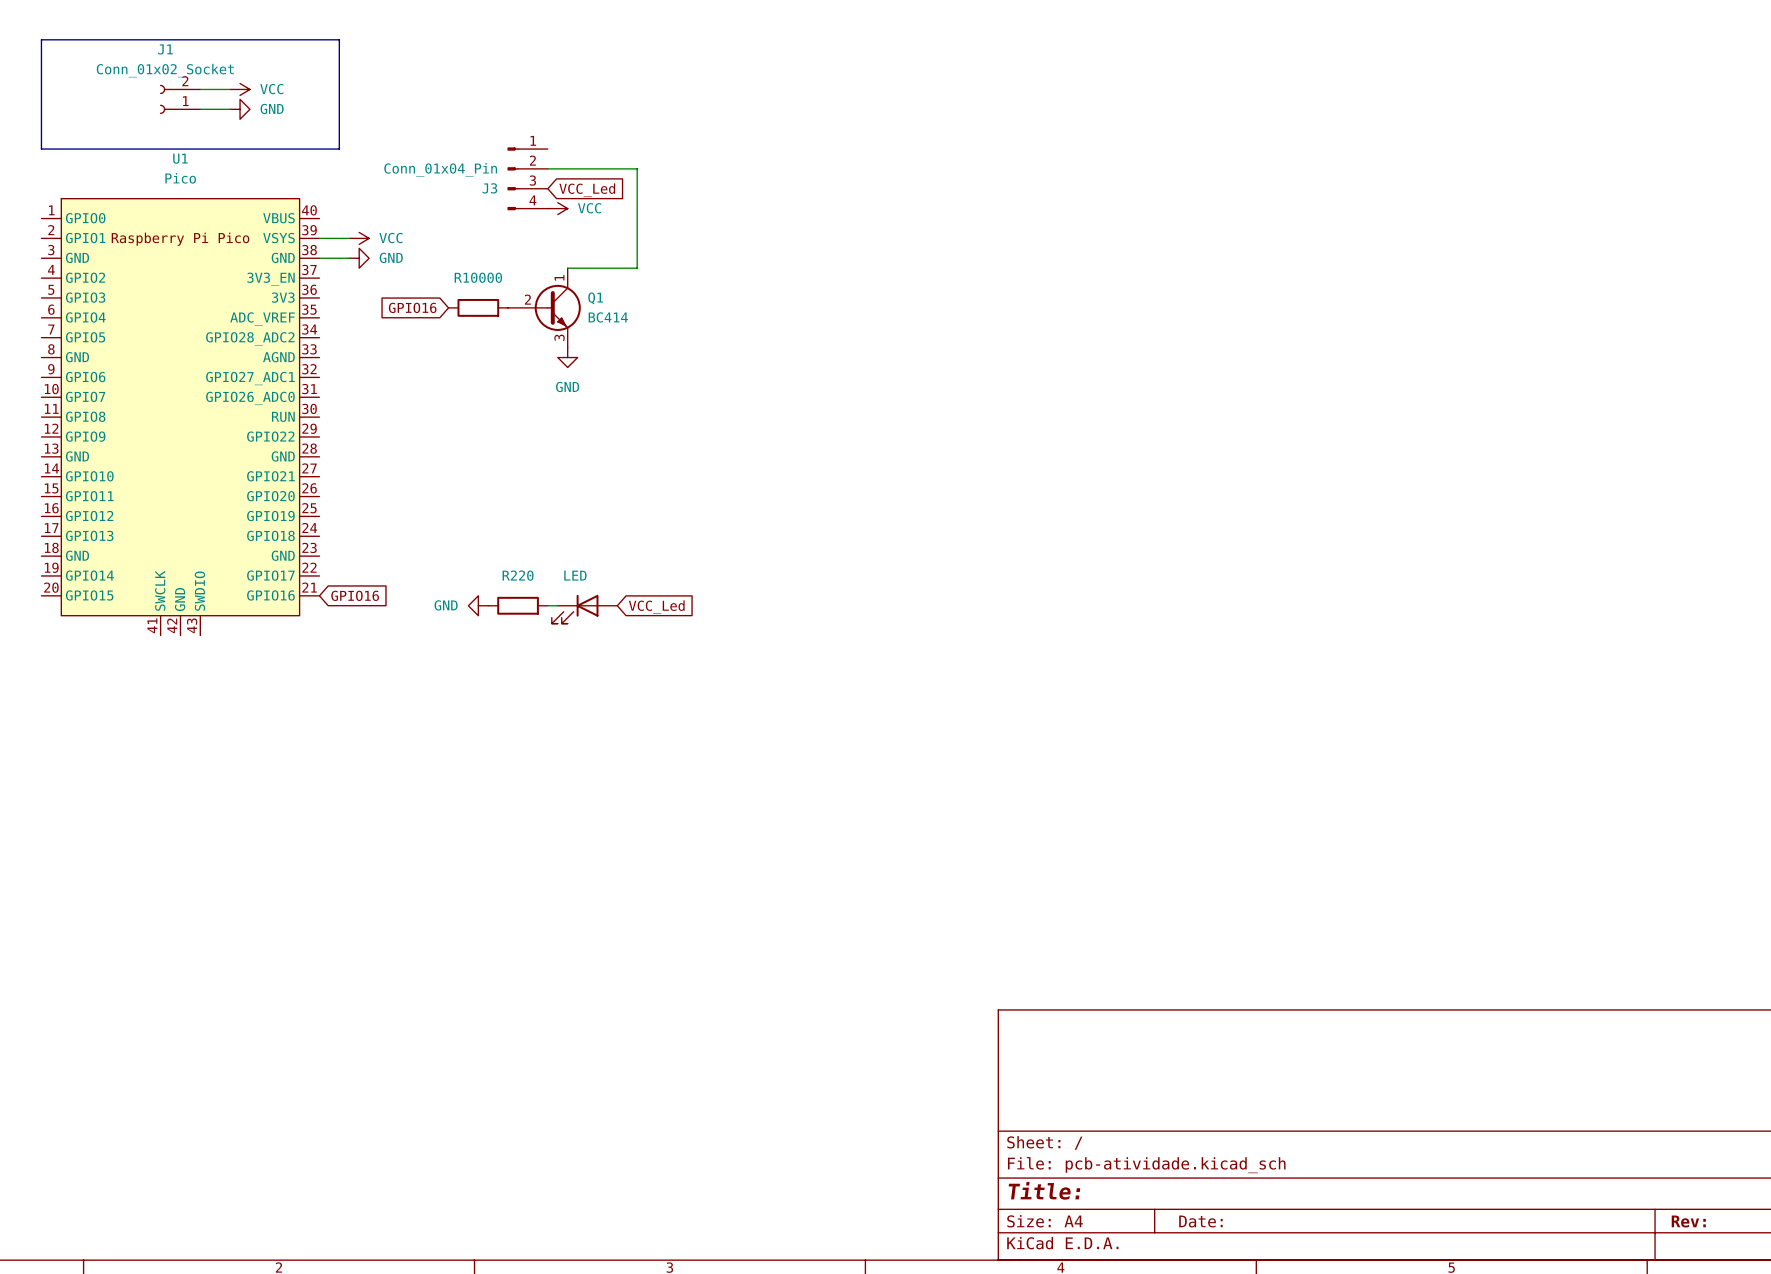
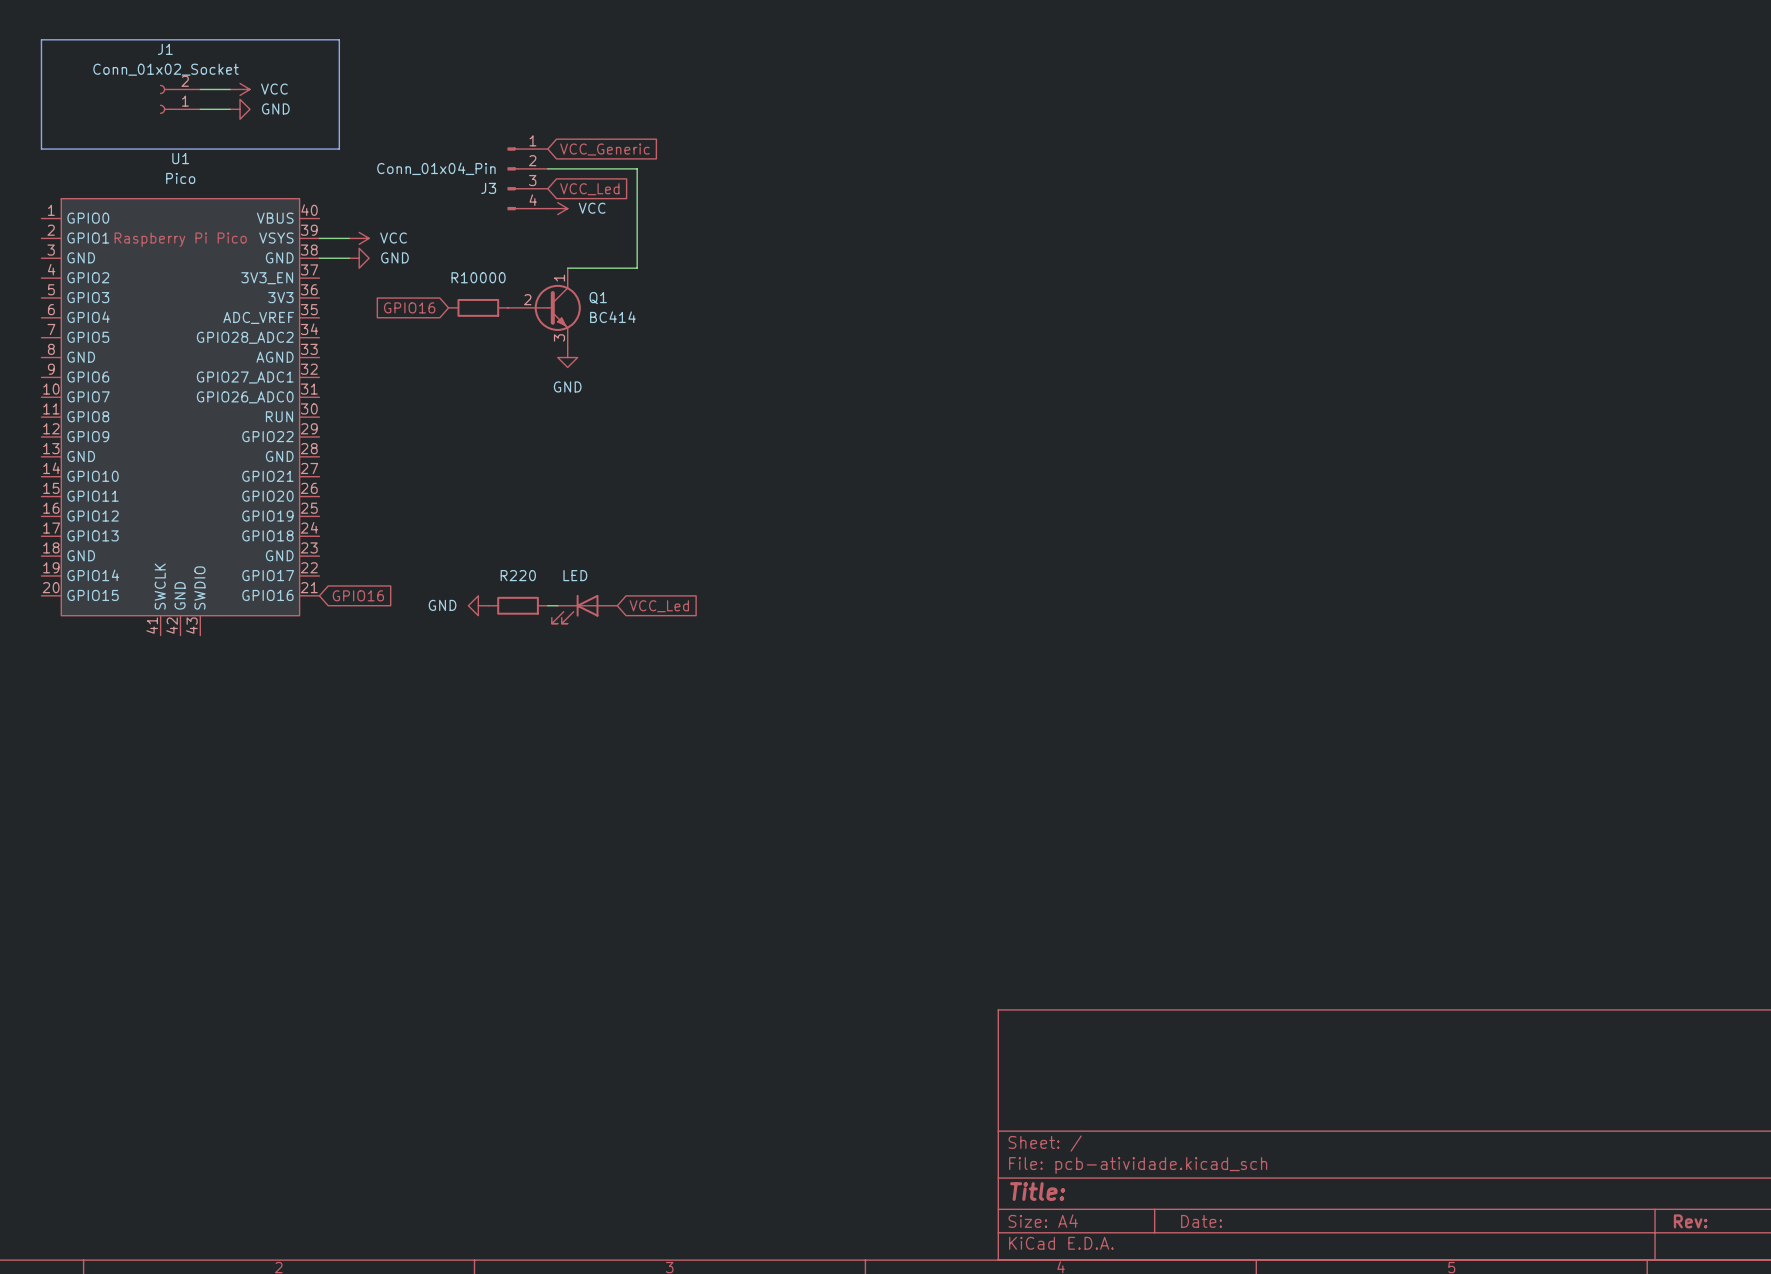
global label: none -> VCC_Generic (604, 149)

